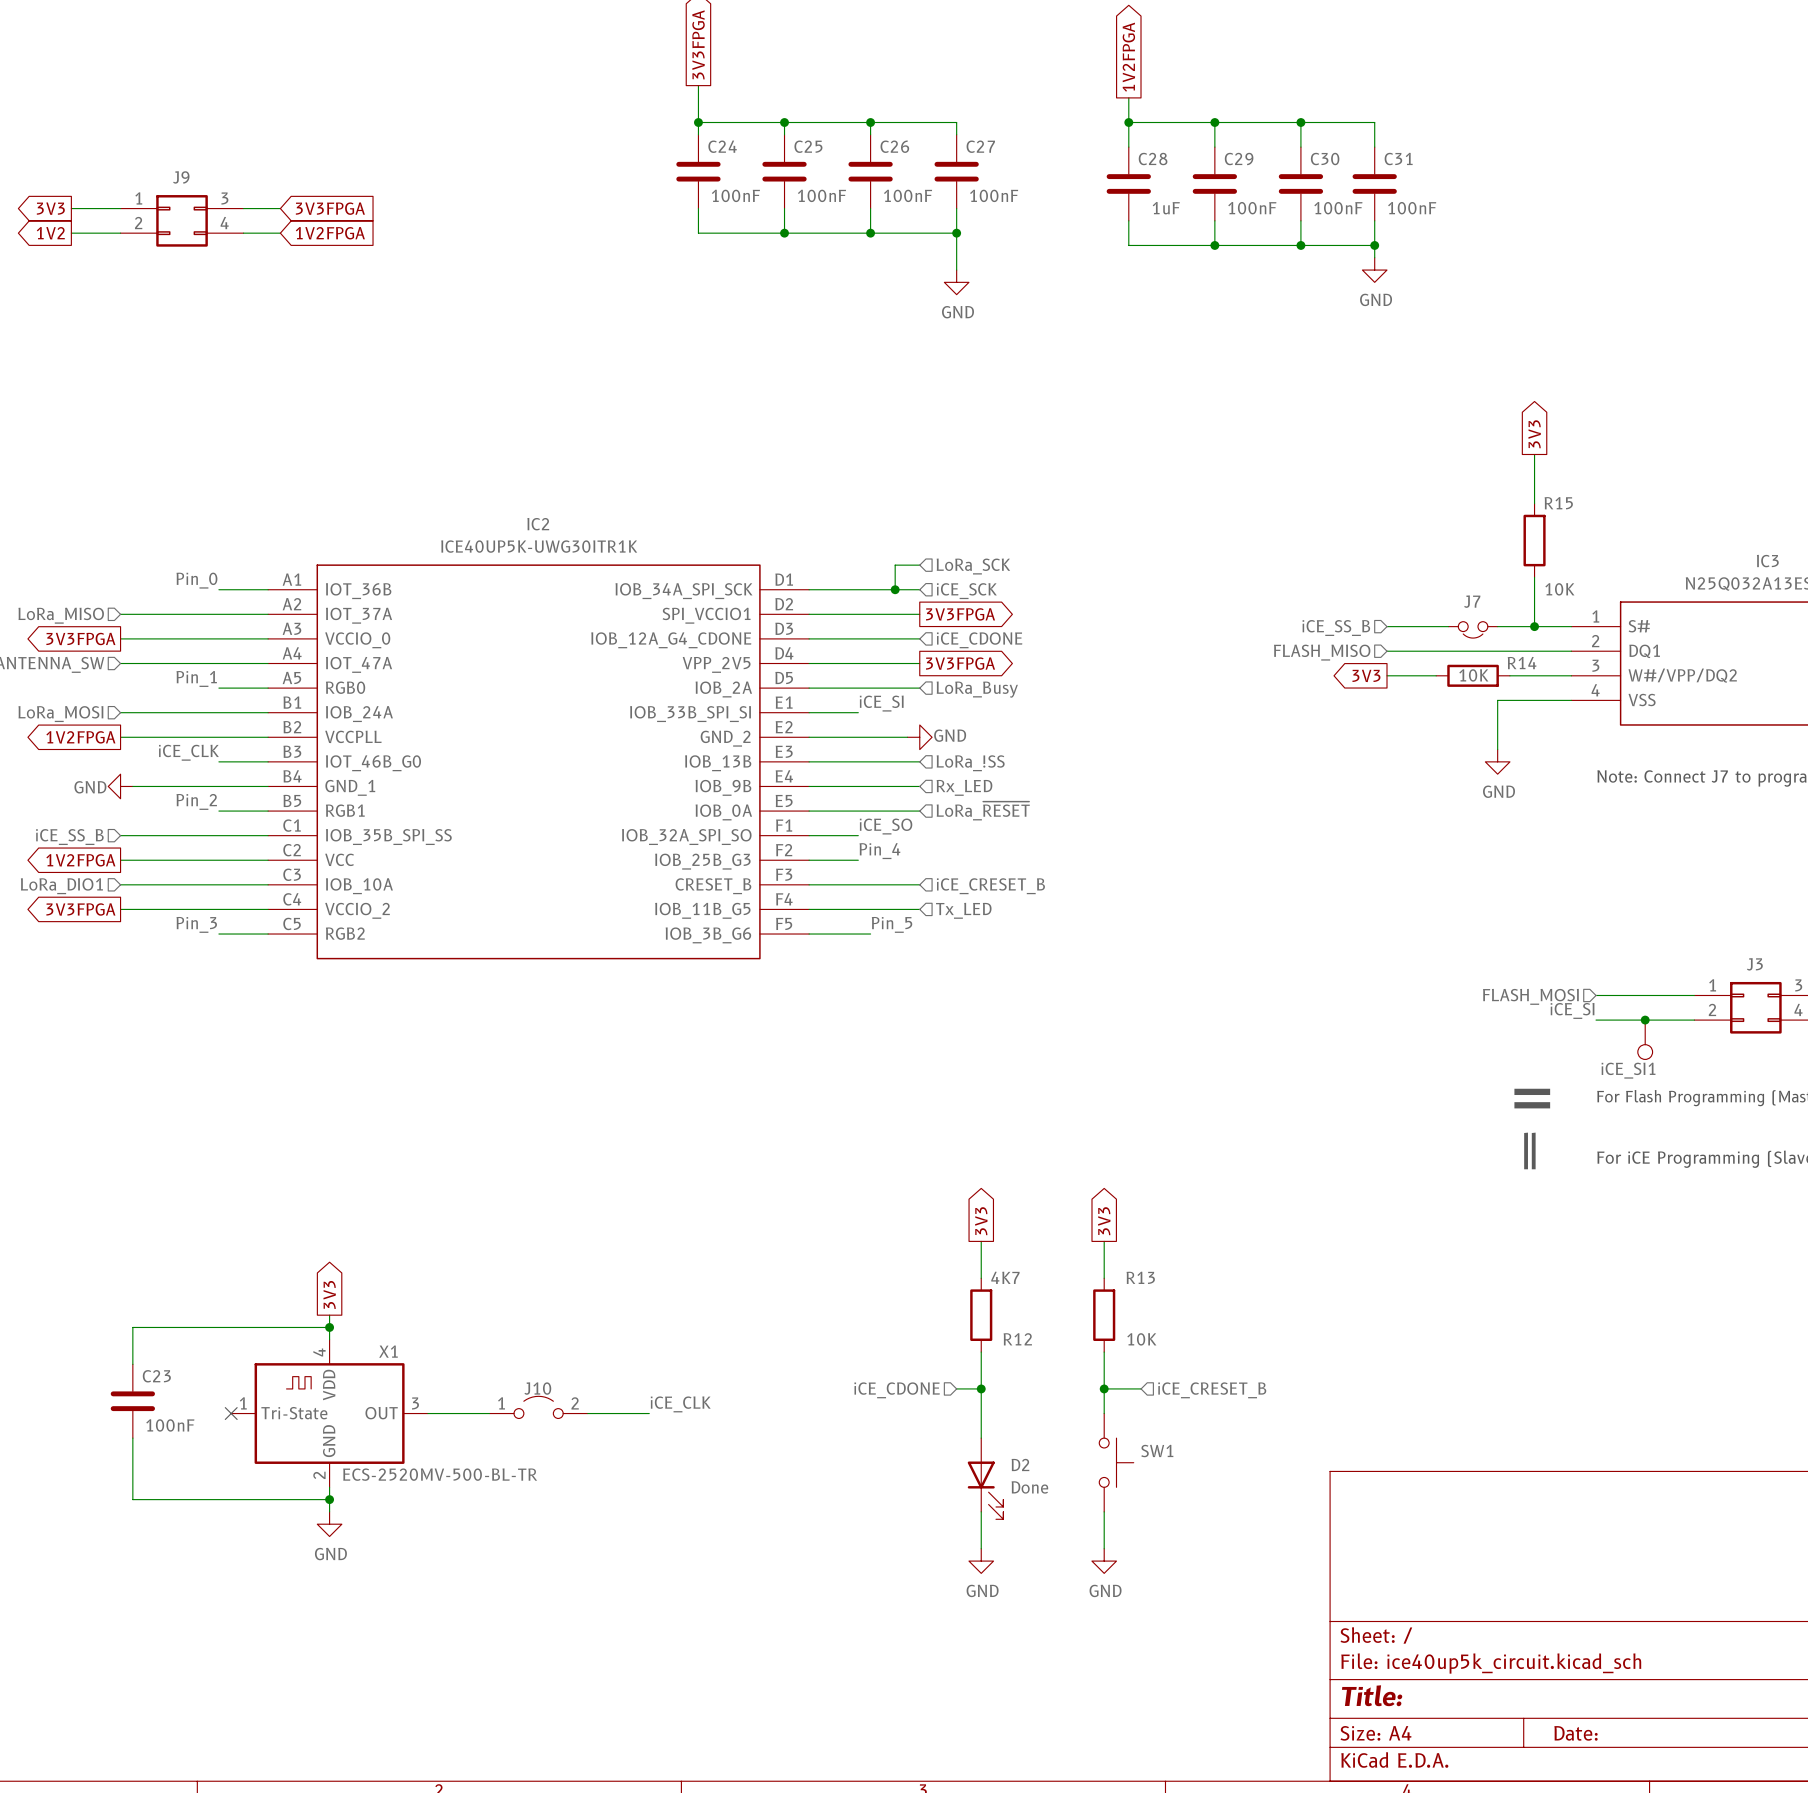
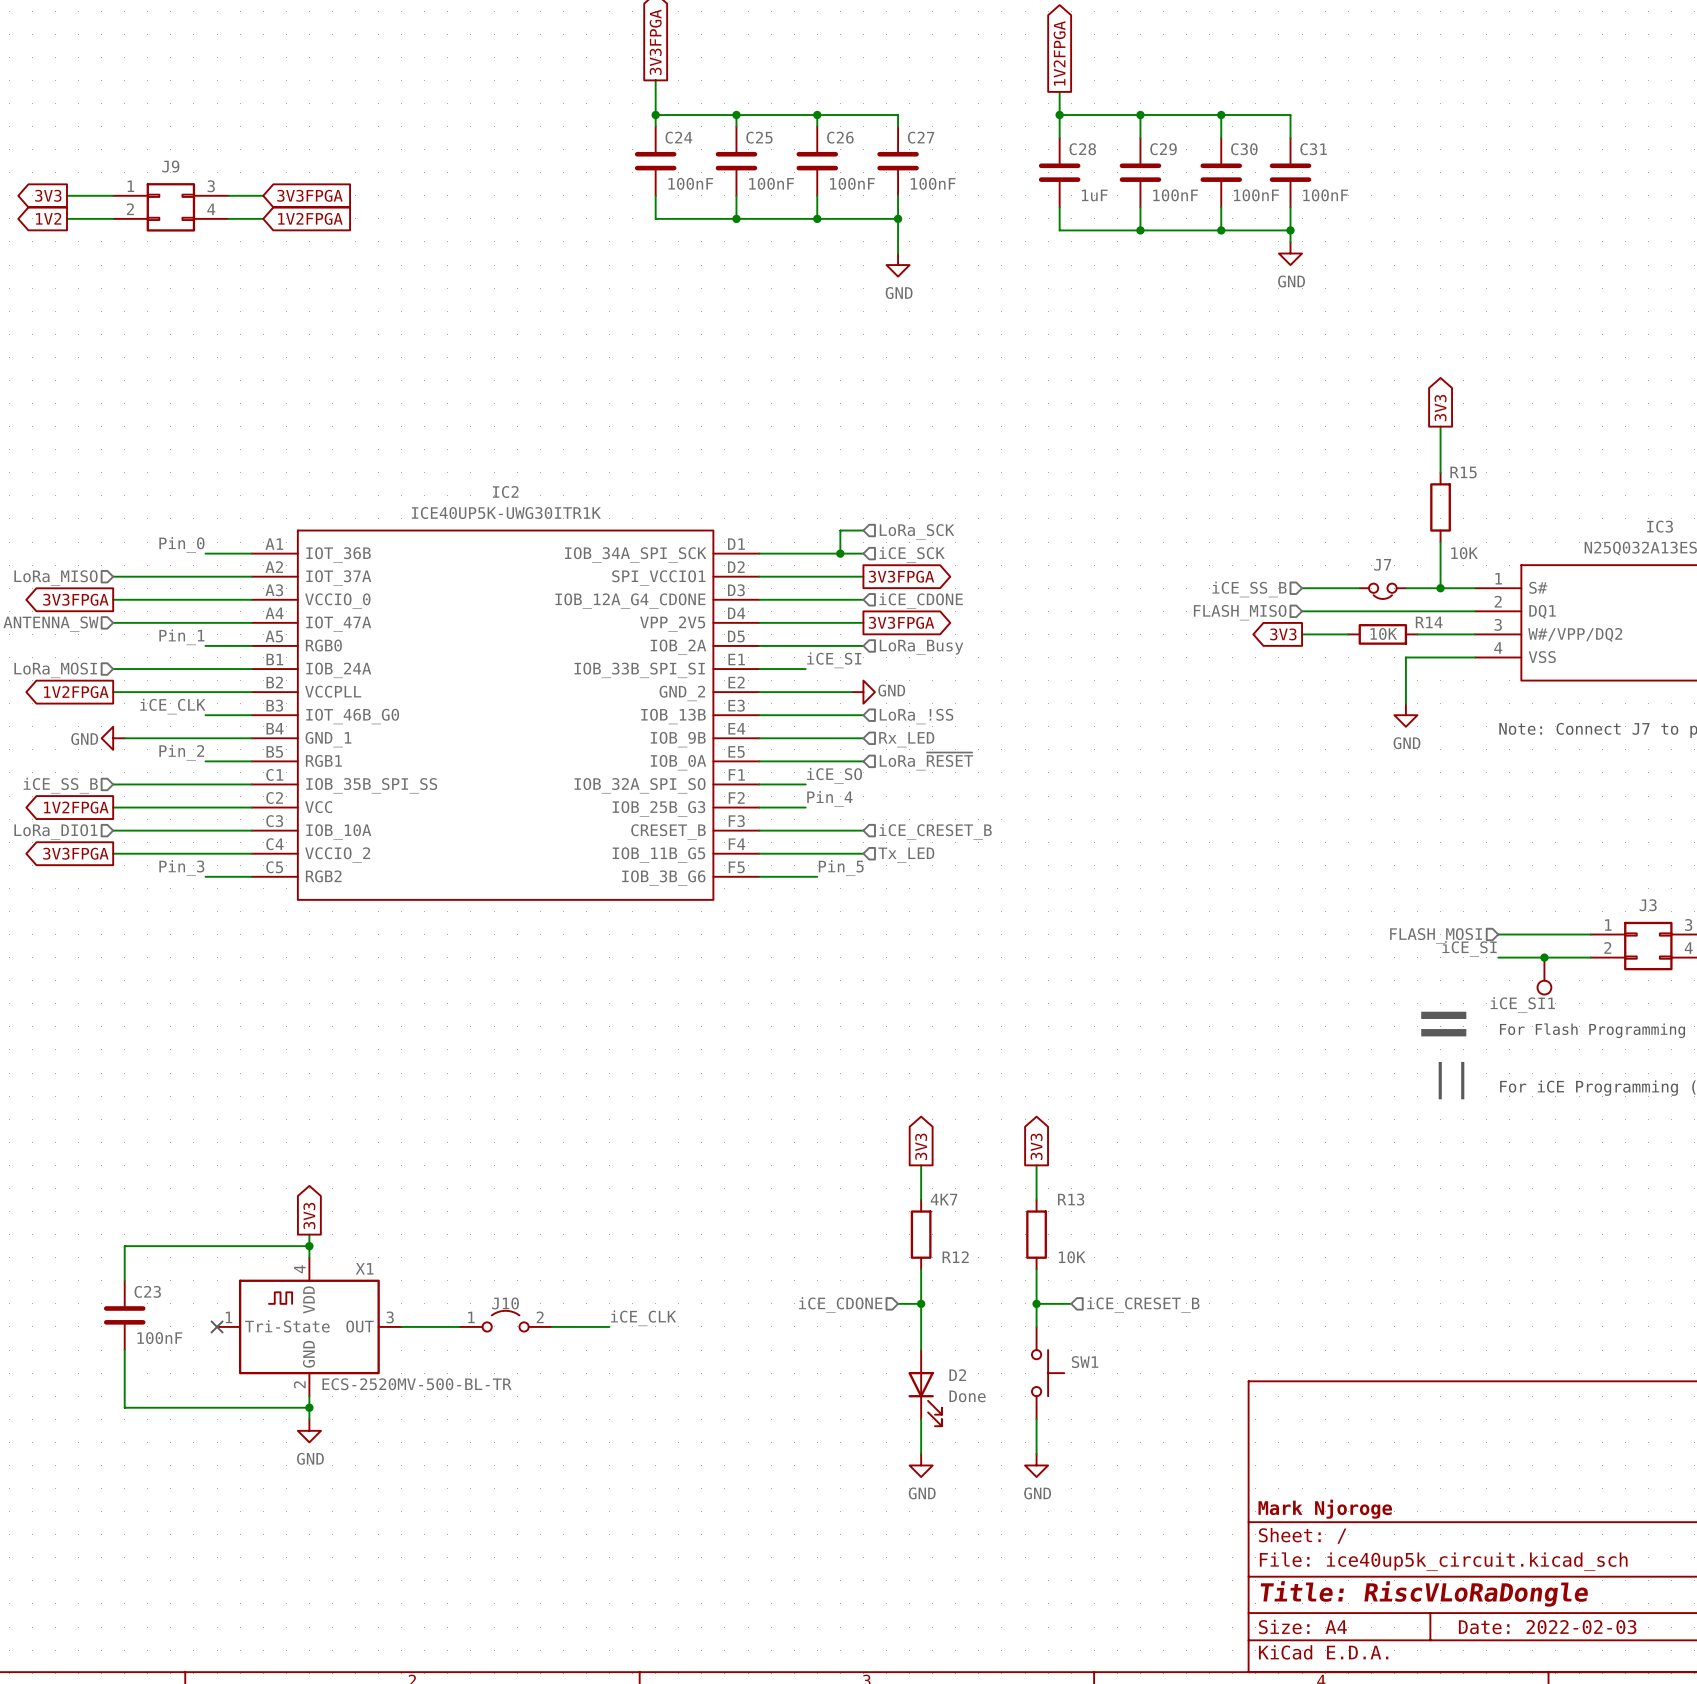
title block: none -> Mark Njoroge (1325, 1509)
title block: Title: (1372, 1695) -> Title: RiscVLoRaDongle (1424, 1593)
title block: Date: (1576, 1733) -> Date: 2022-02-03 (1547, 1627)

